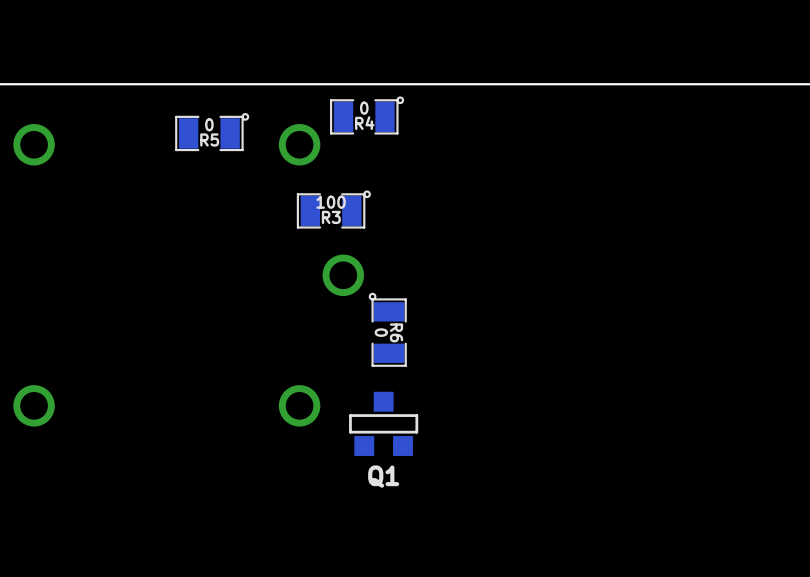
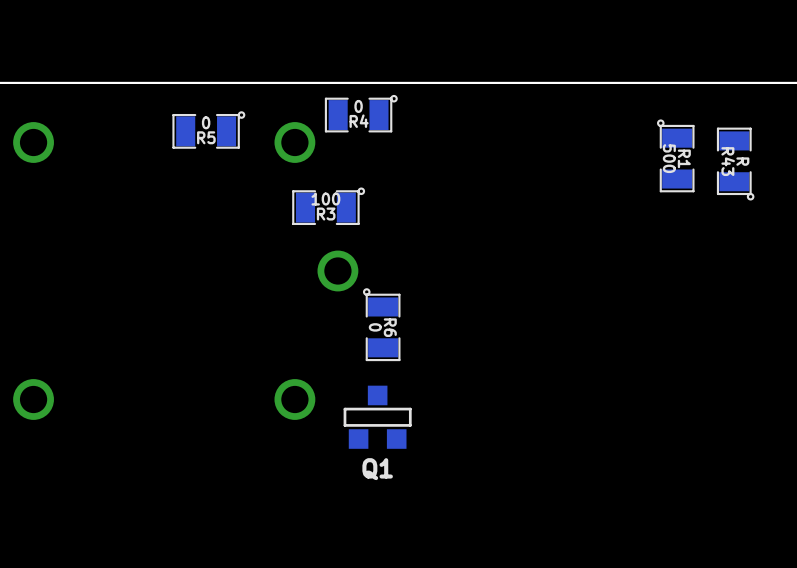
R1: none -> 500 (675, 155)
R43: none -> R (735, 164)

